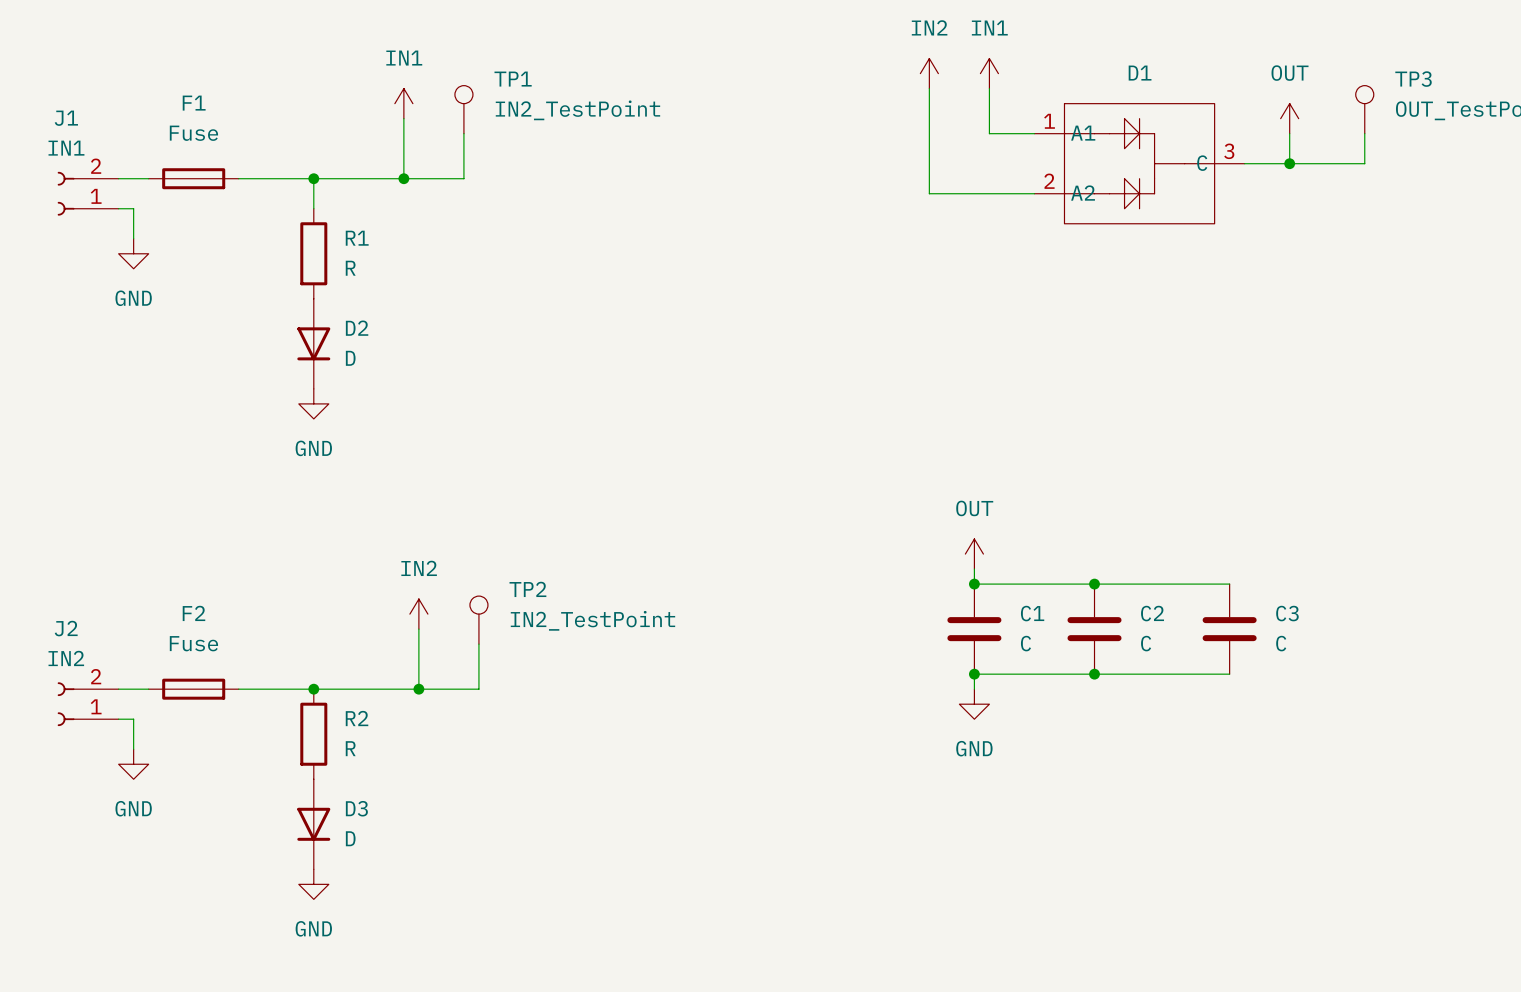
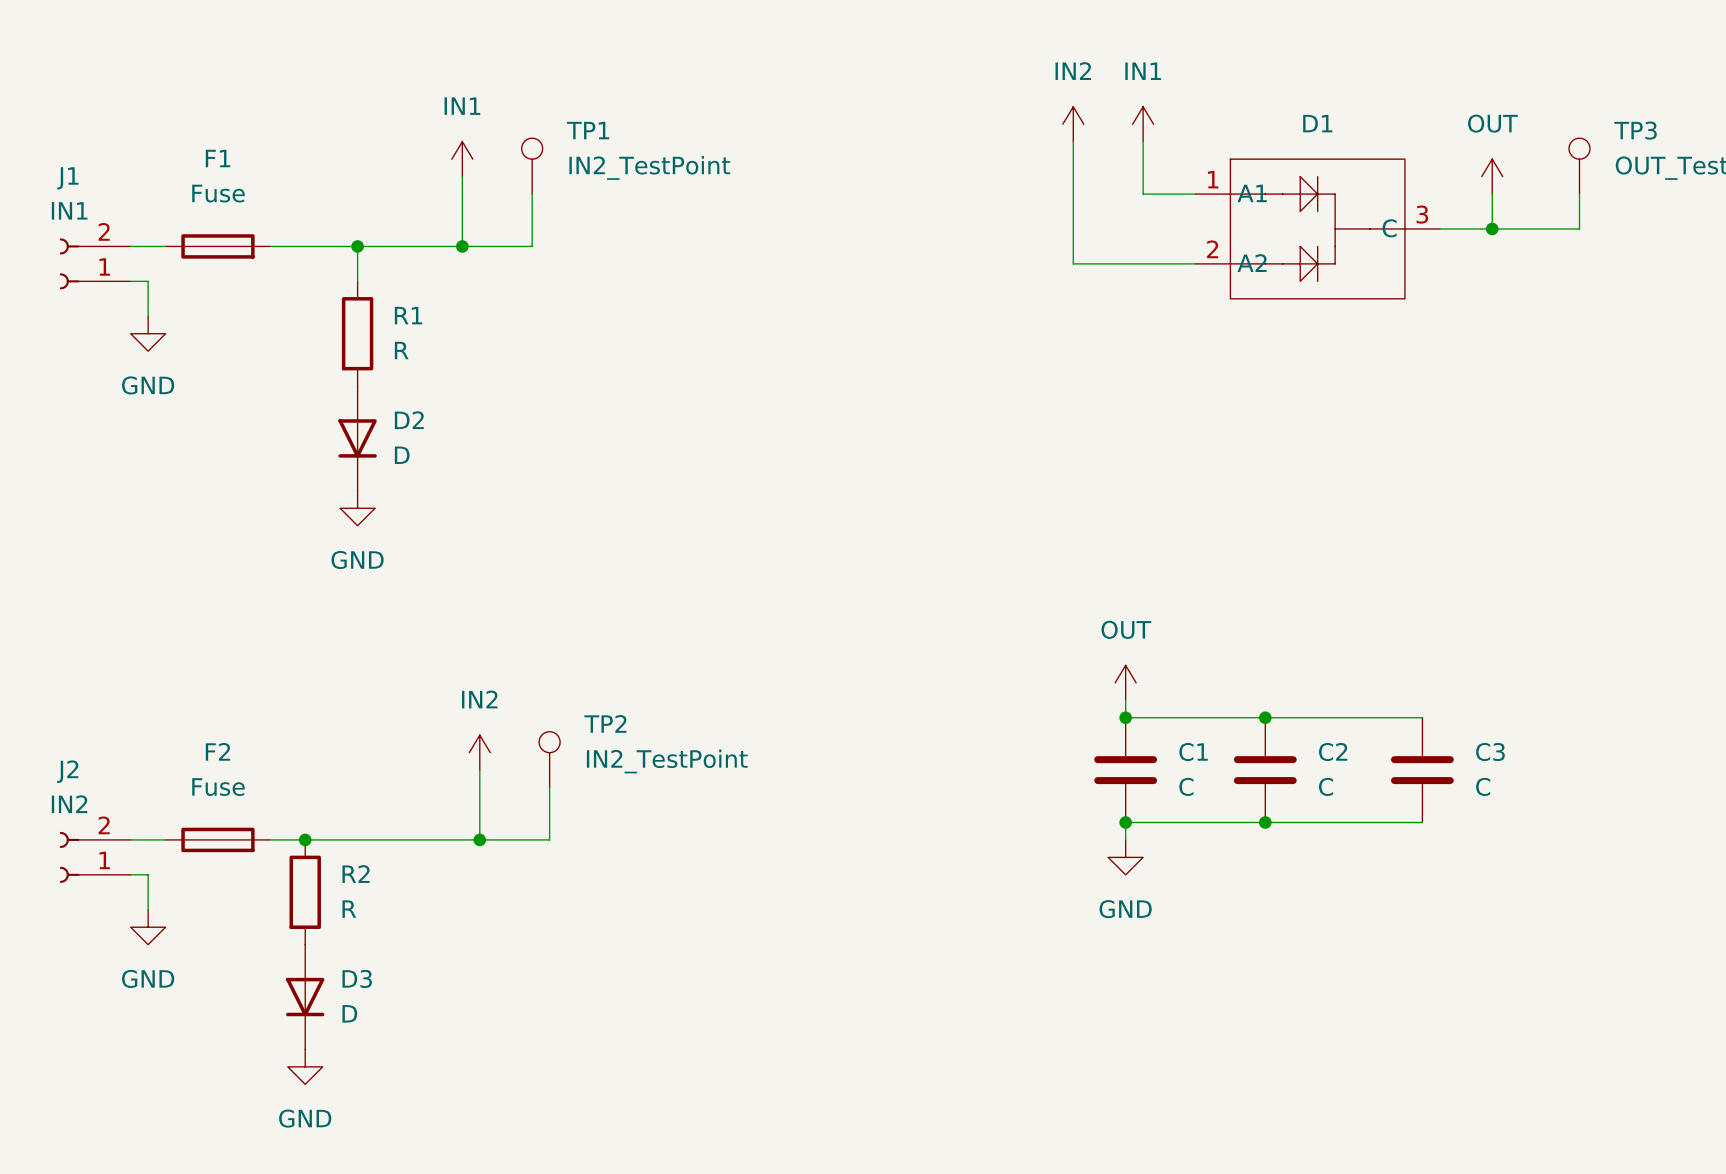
junction position: (313, 689) -> (305, 839)
R2 position: (313, 734) -> (305, 892)
D3 position: (313, 824) -> (305, 997)
power symbol position: GND (313, 884) -> GND (305, 1066)

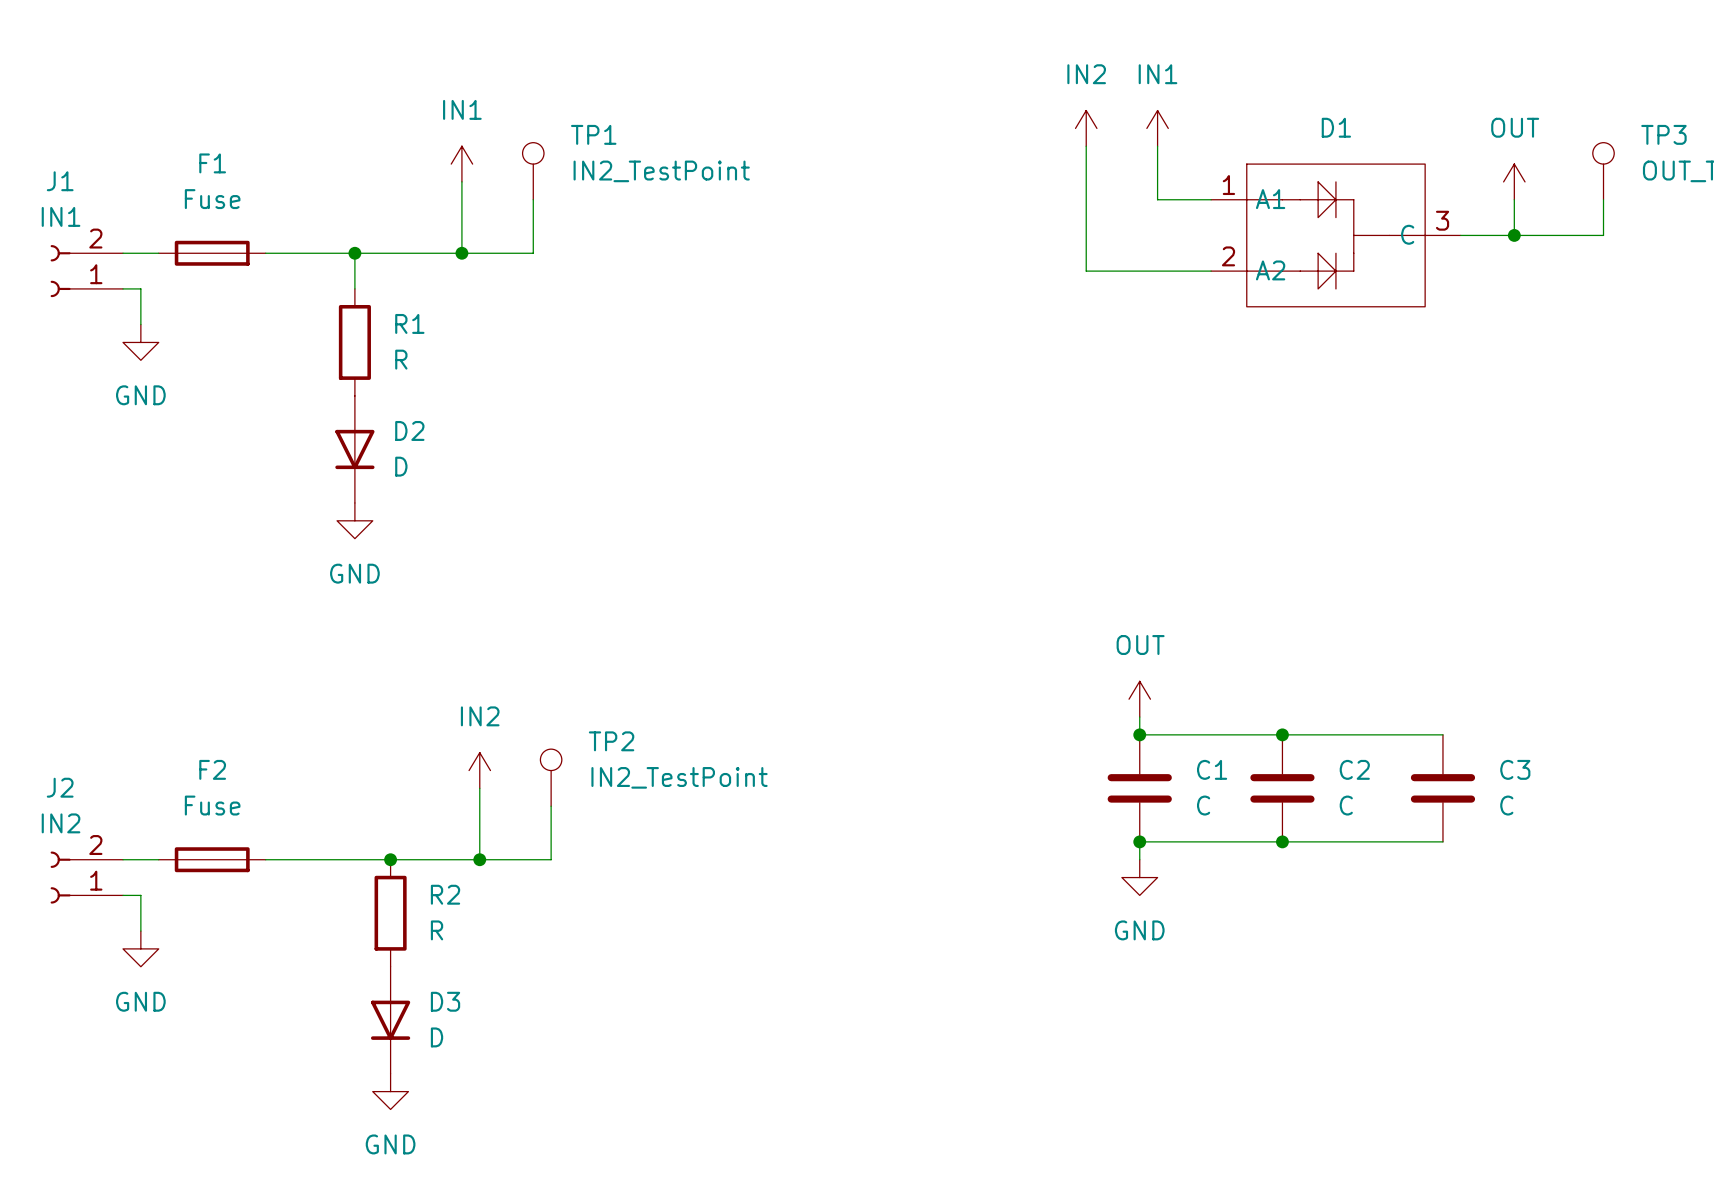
junction: (305, 839) -> none
junction: none -> (390, 859)
R2 position: (305, 892) -> (390, 913)
D3 position: (305, 997) -> (390, 1020)
power symbol position: GND (305, 1066) -> GND (390, 1091)

